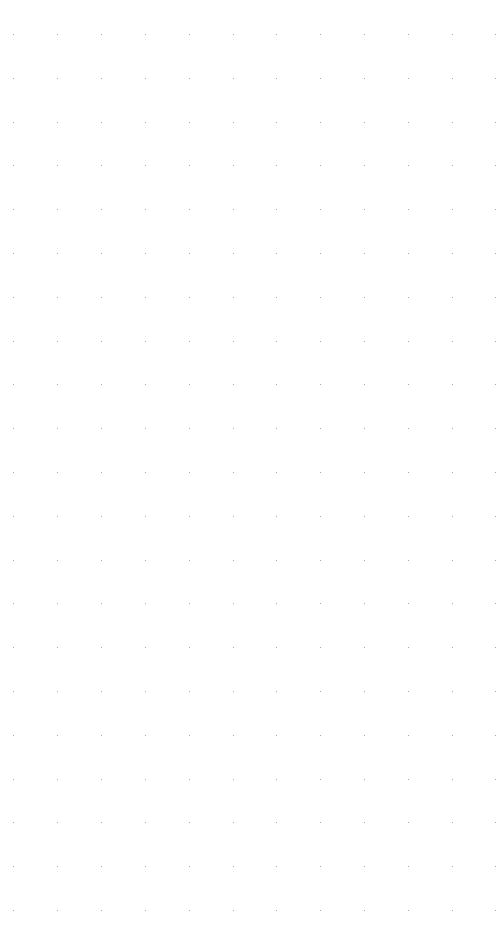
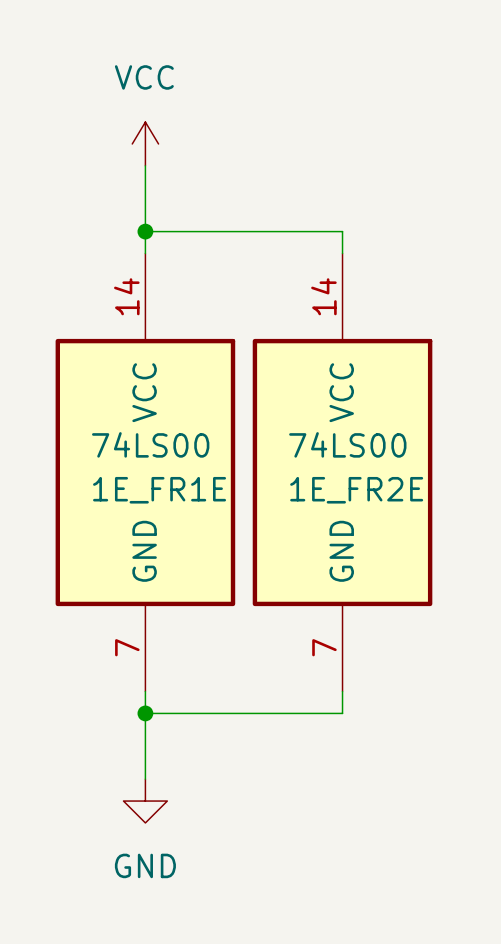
power symbol: none -> VCC (145, 143)
wire: none -> (145, 165) (145, 253)
wire: none -> (145, 231) (342, 231) (342, 253)
junction: none -> (145, 231)
1E_FR1E: none -> 74LS00 (145, 472)
1E_FR2E: none -> 74LS00 (342, 472)
wire: none -> (145, 691) (145, 779)
wire: none -> (342, 691) (342, 713) (145, 713)
junction: none -> (145, 713)
power symbol: none -> GND (145, 801)

